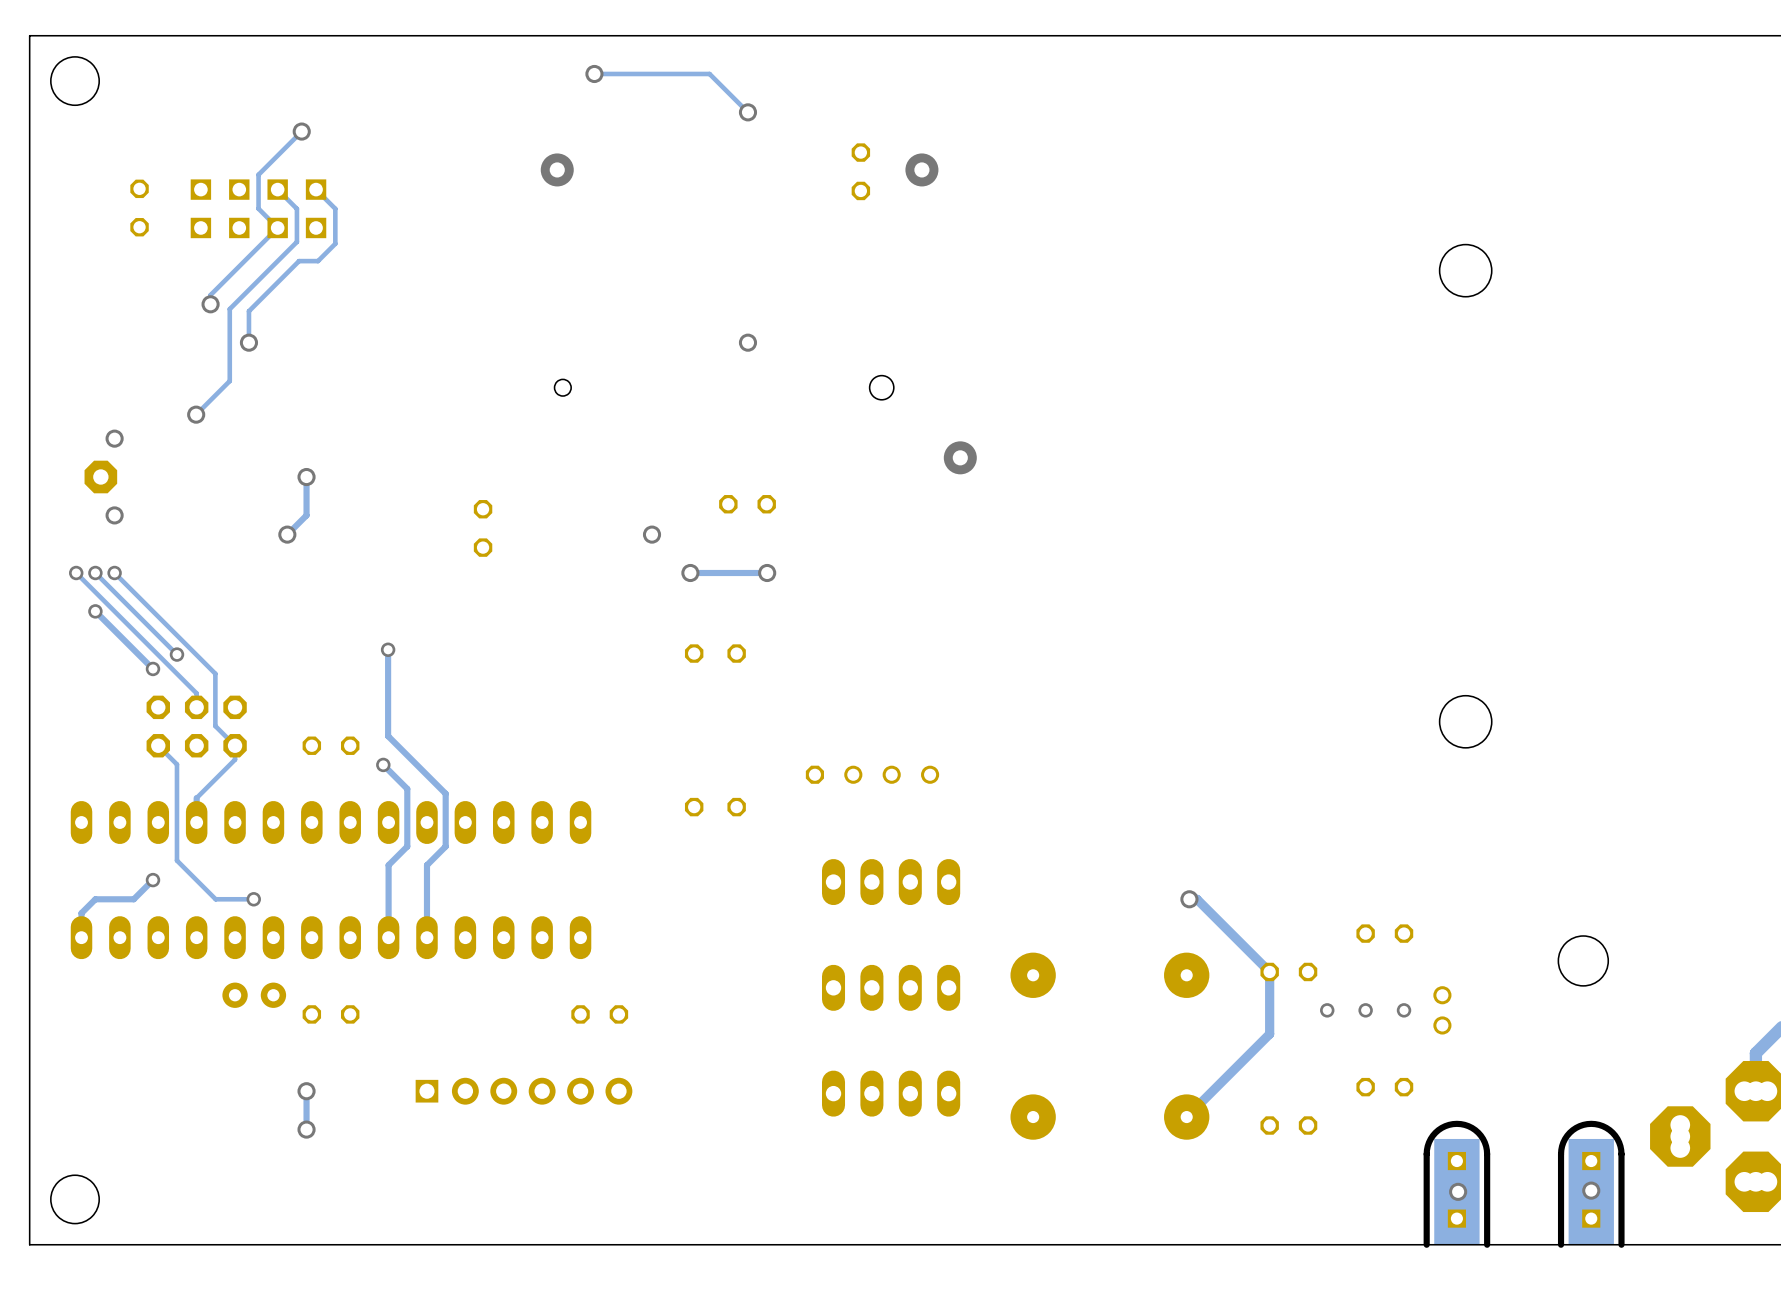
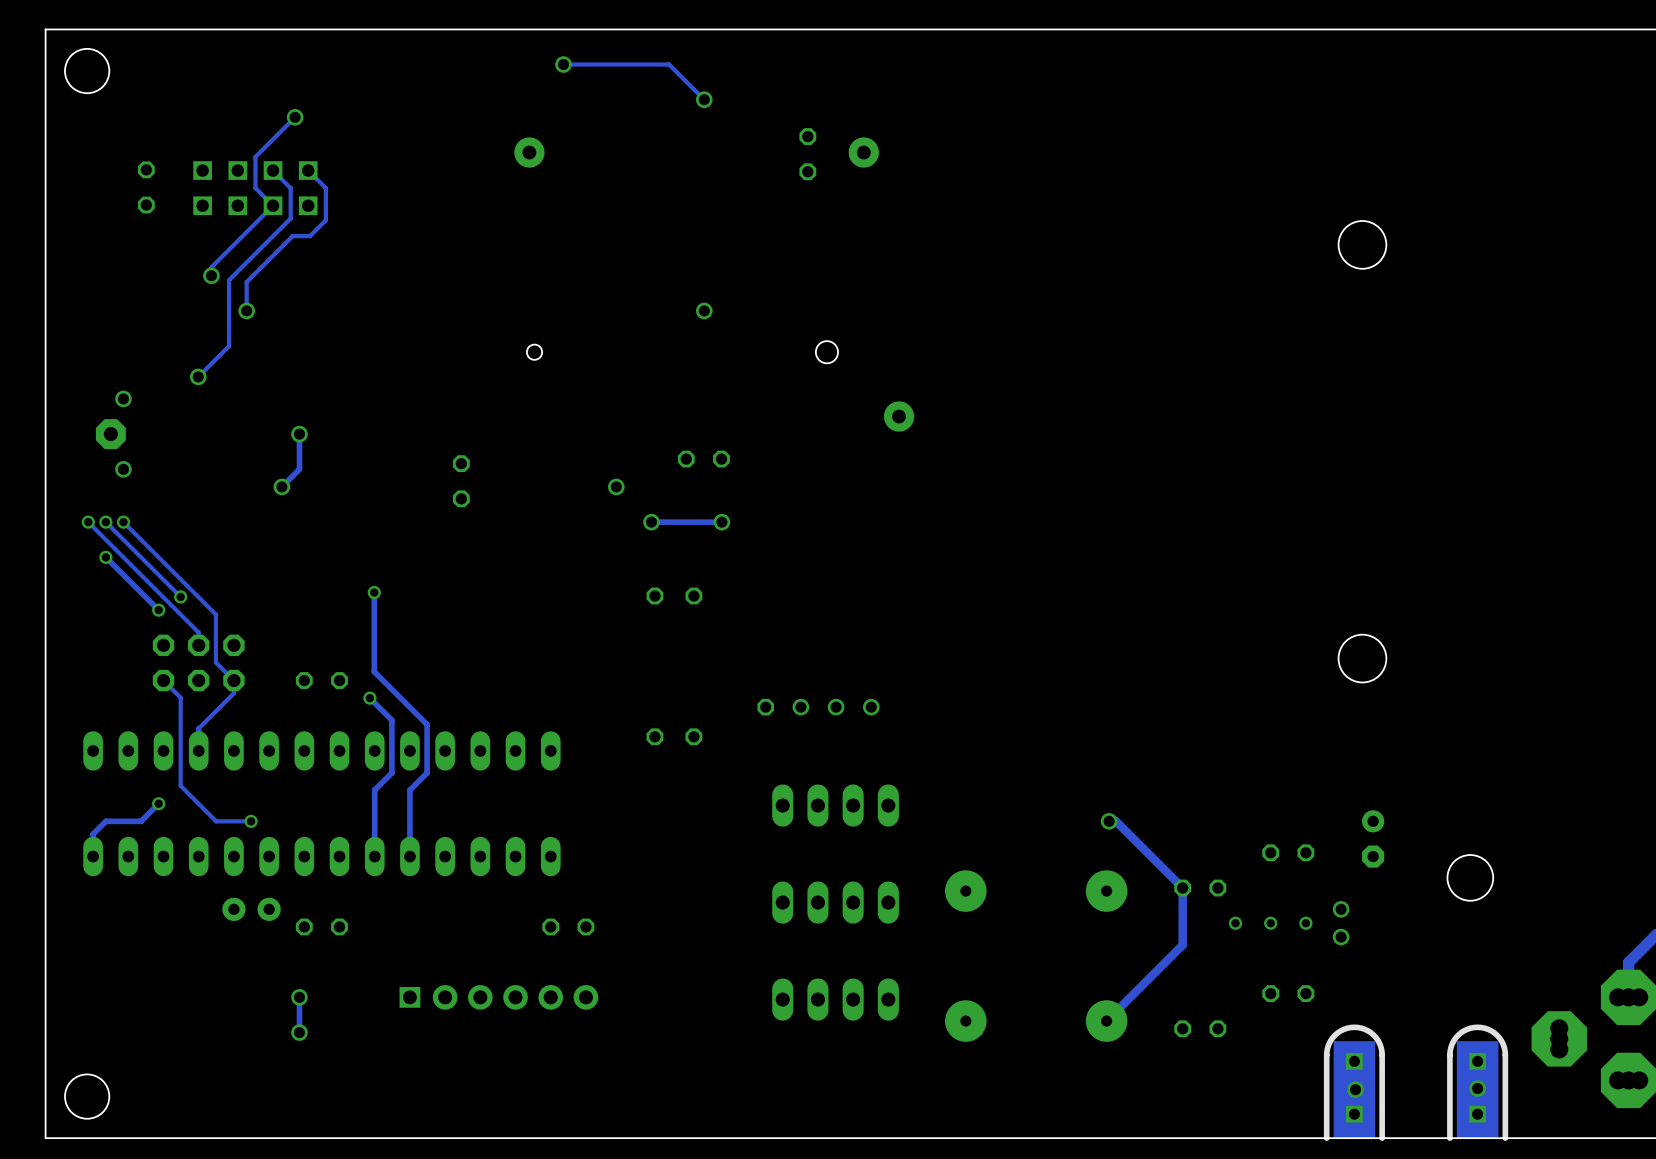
part: none -> (1373, 838)

